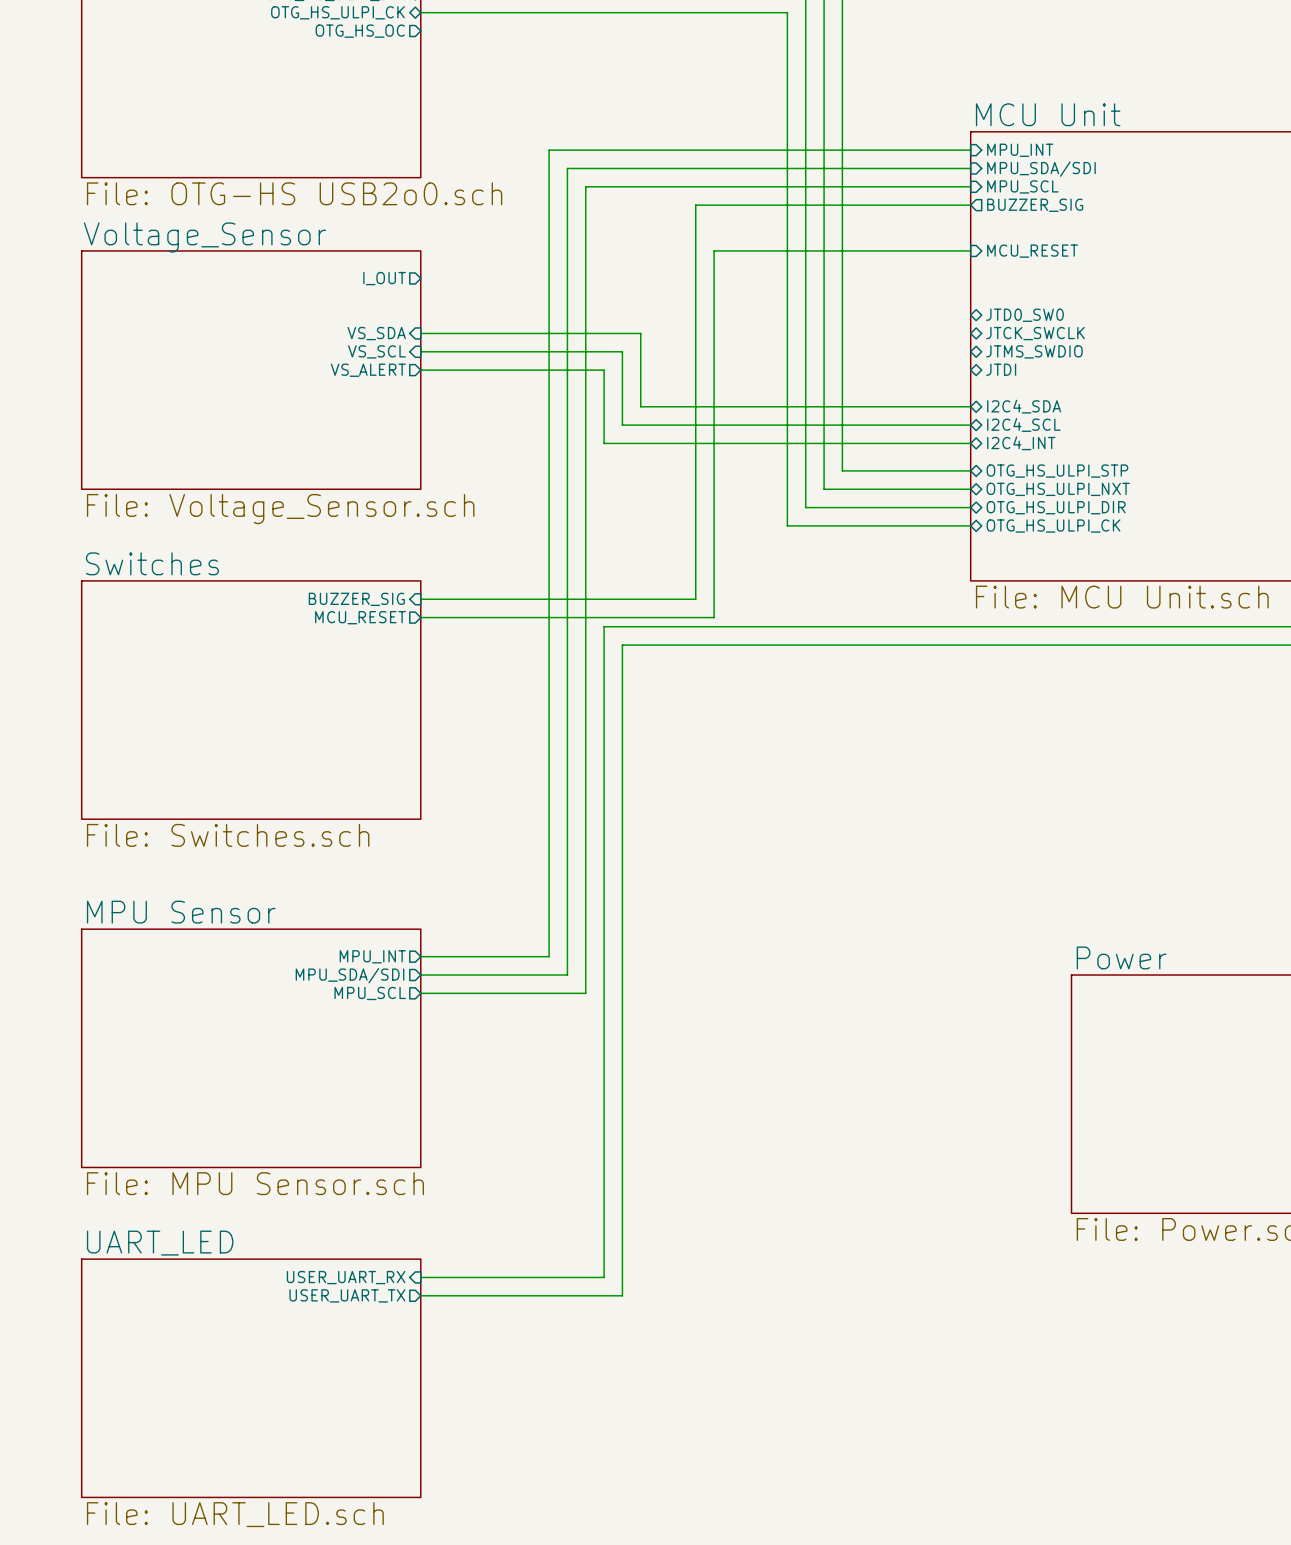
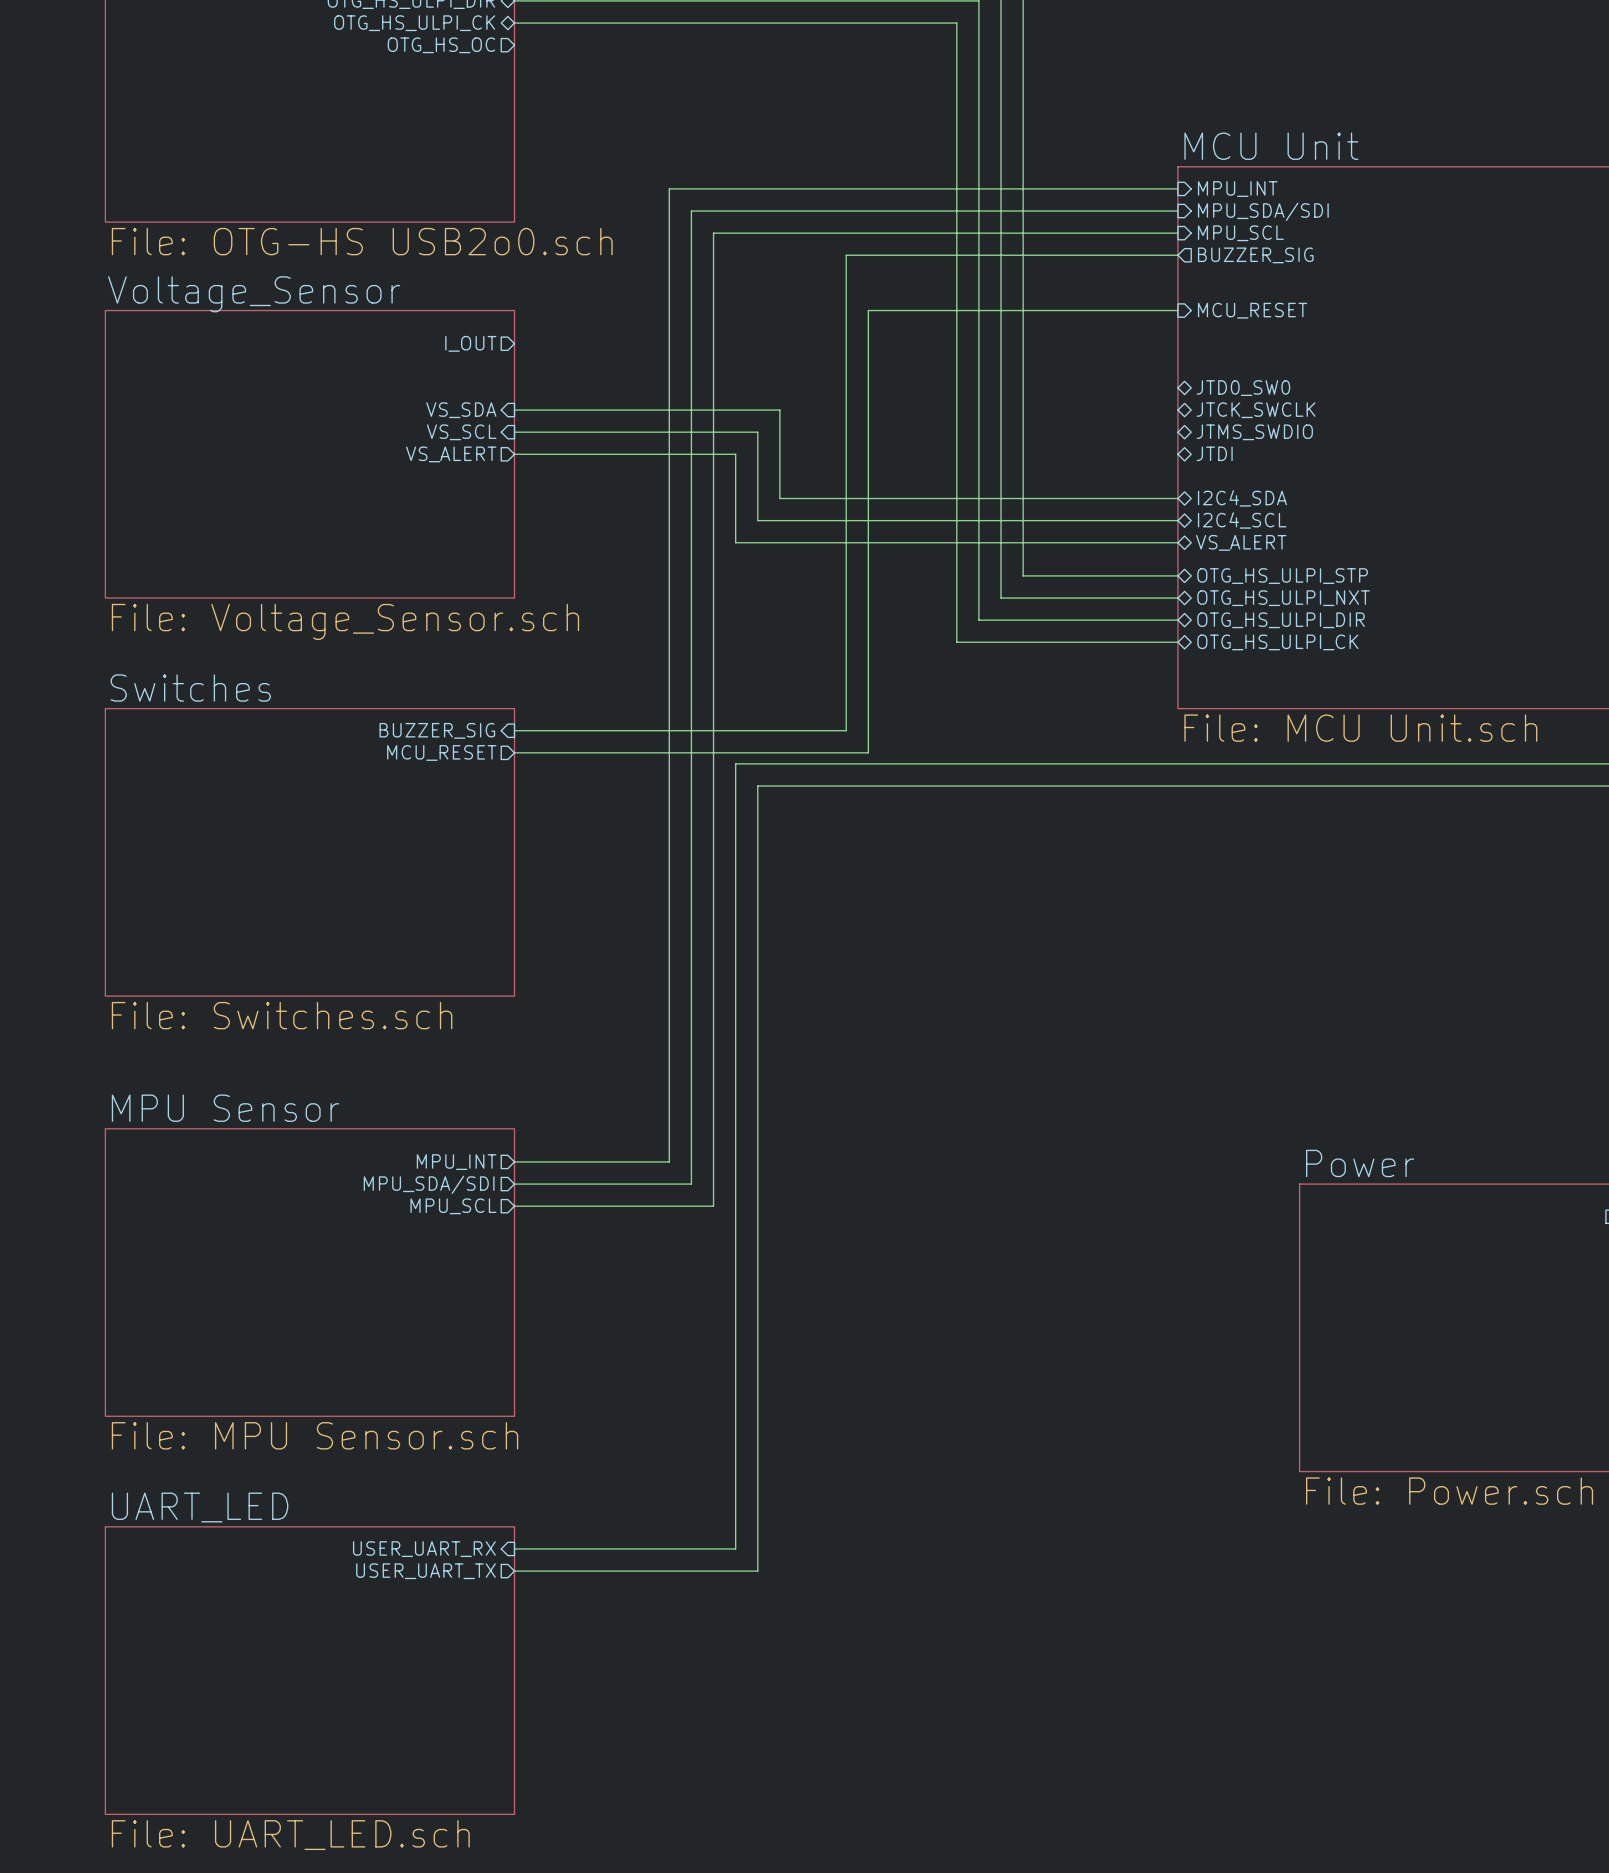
sheet pin: I2C4_INT (1021, 443) -> VS_ALERT (1241, 542)

